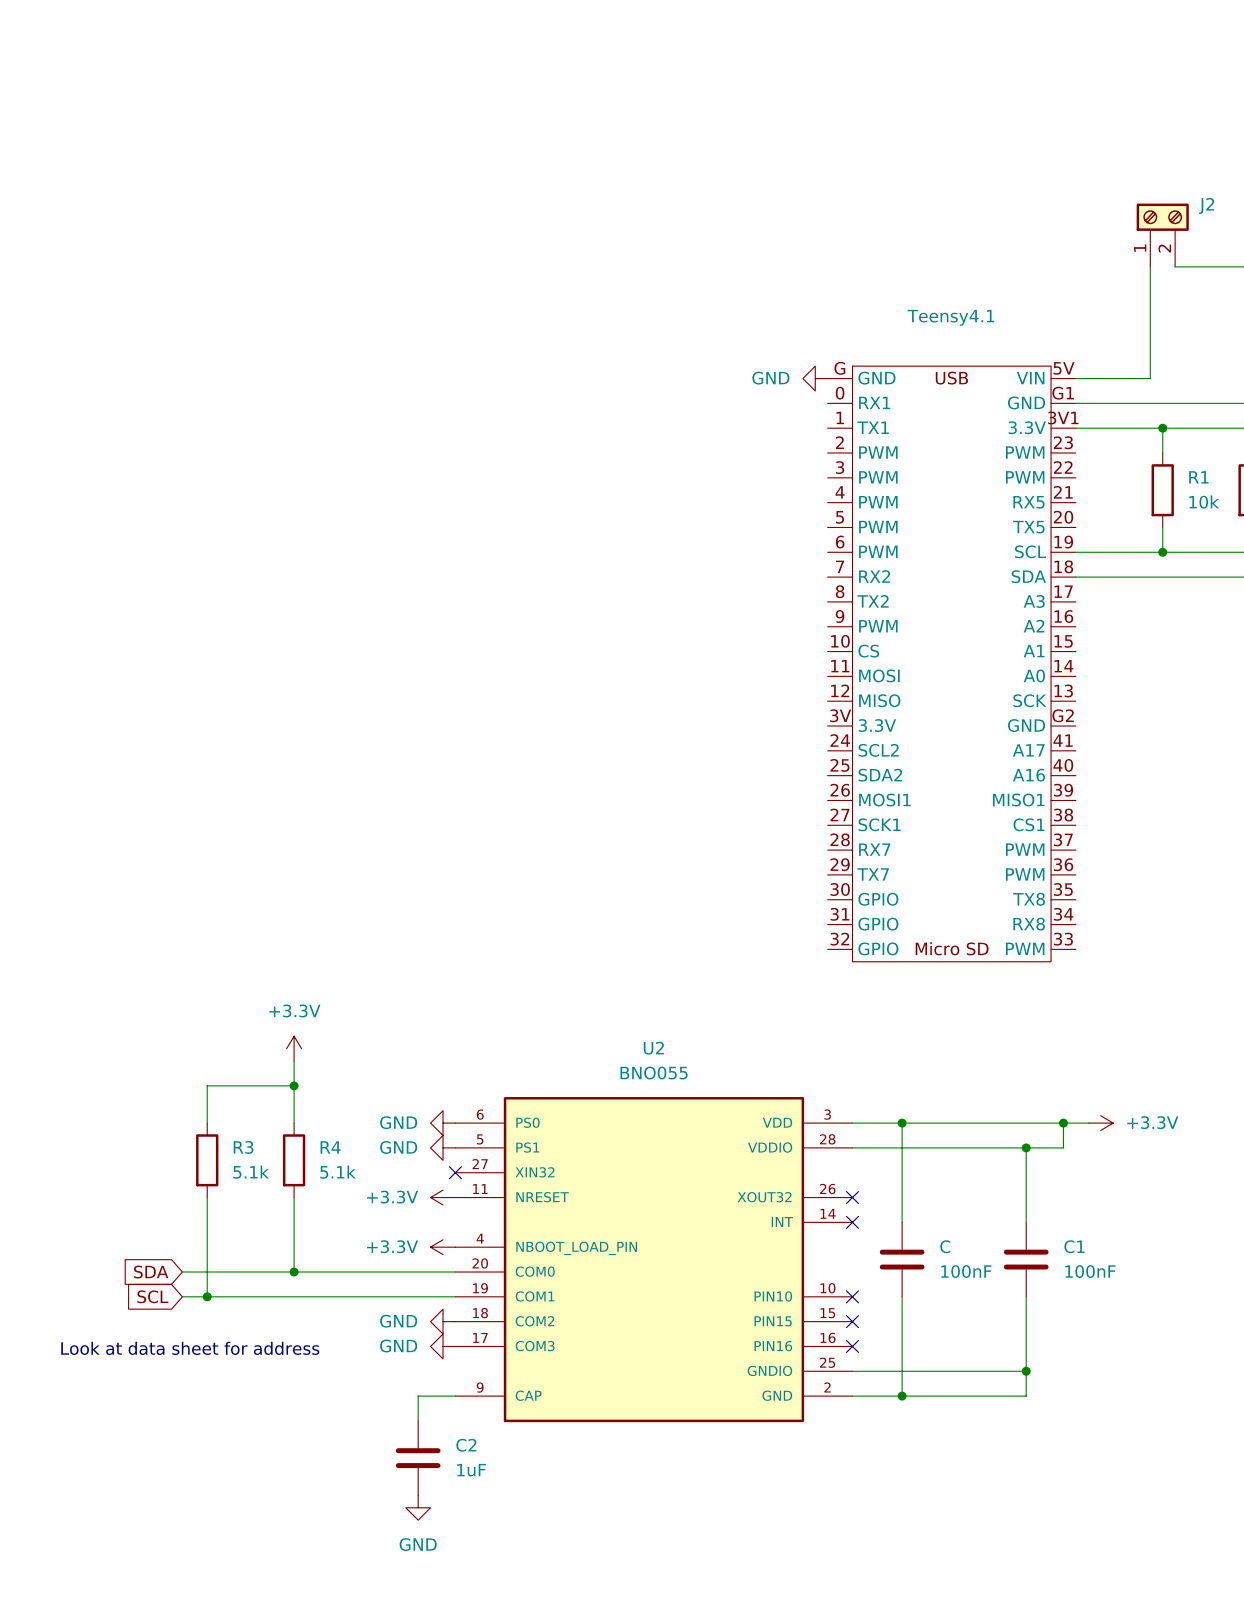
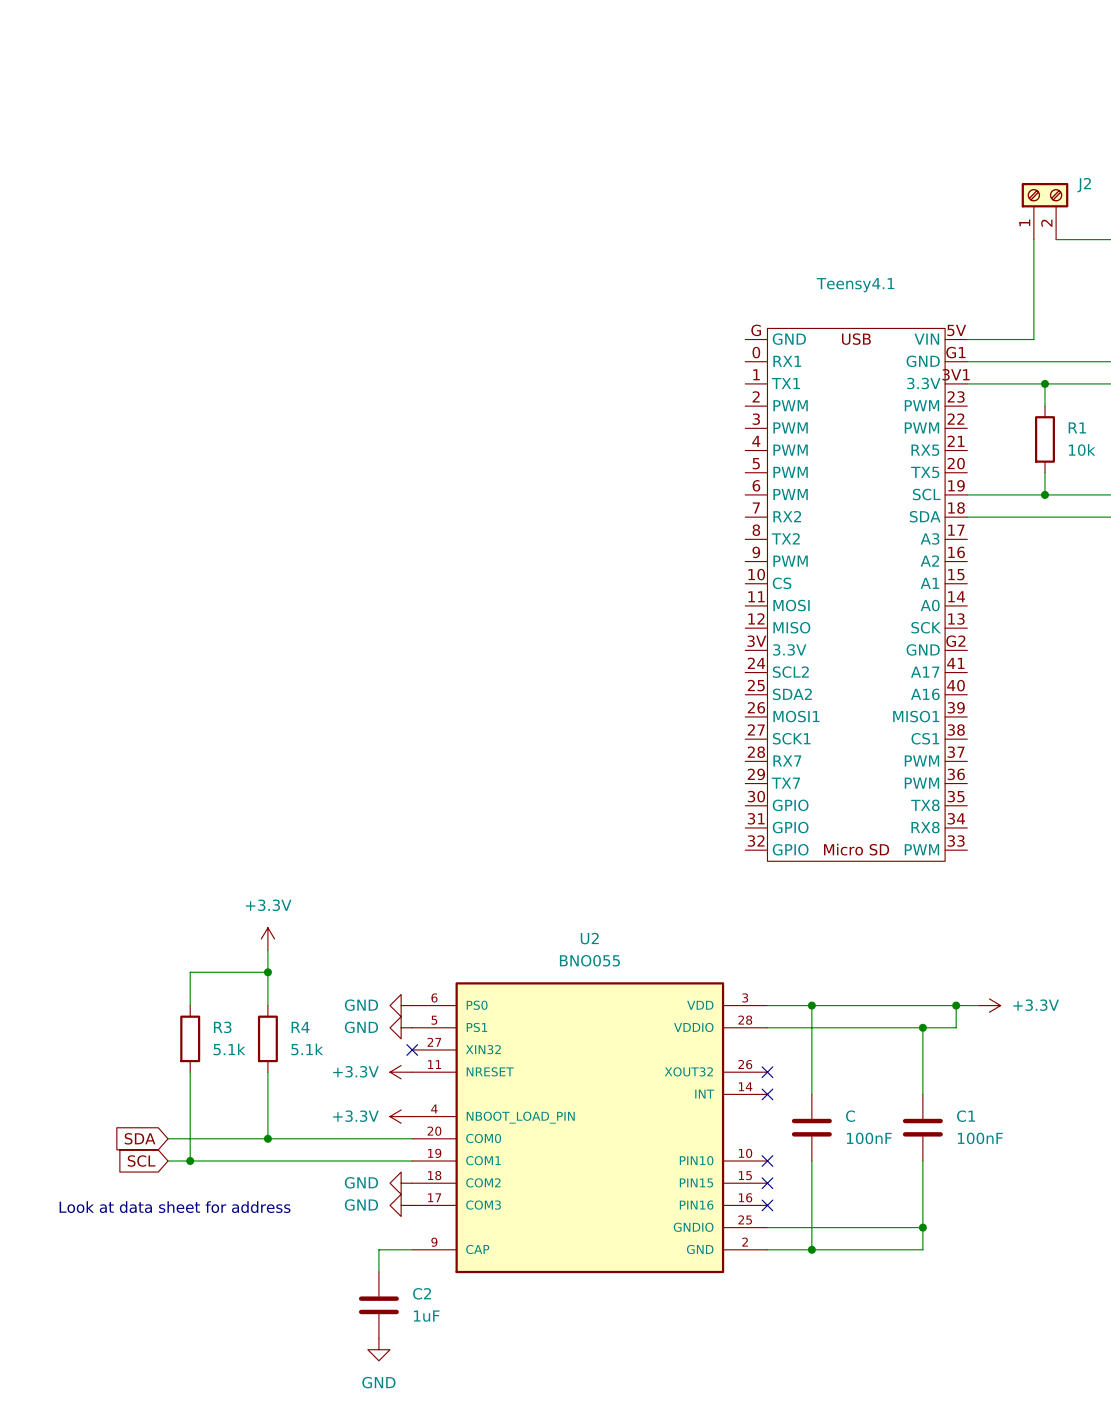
power symbol: GND (815, 378) -> none

